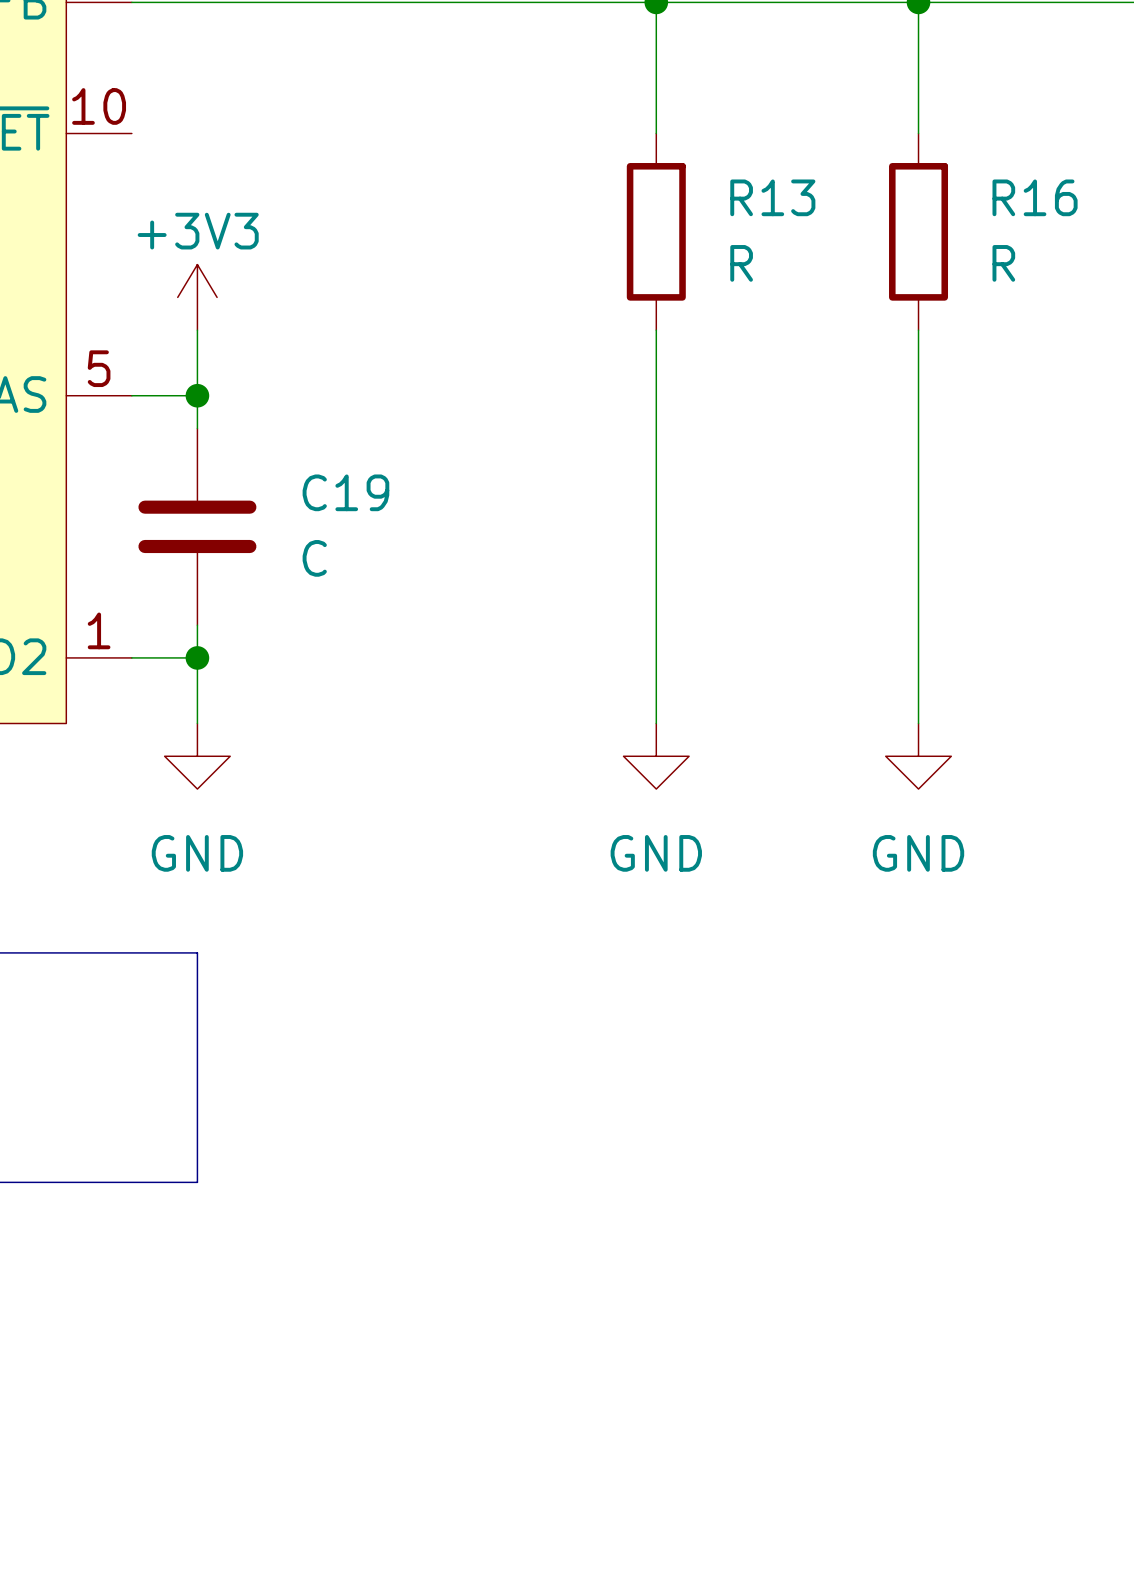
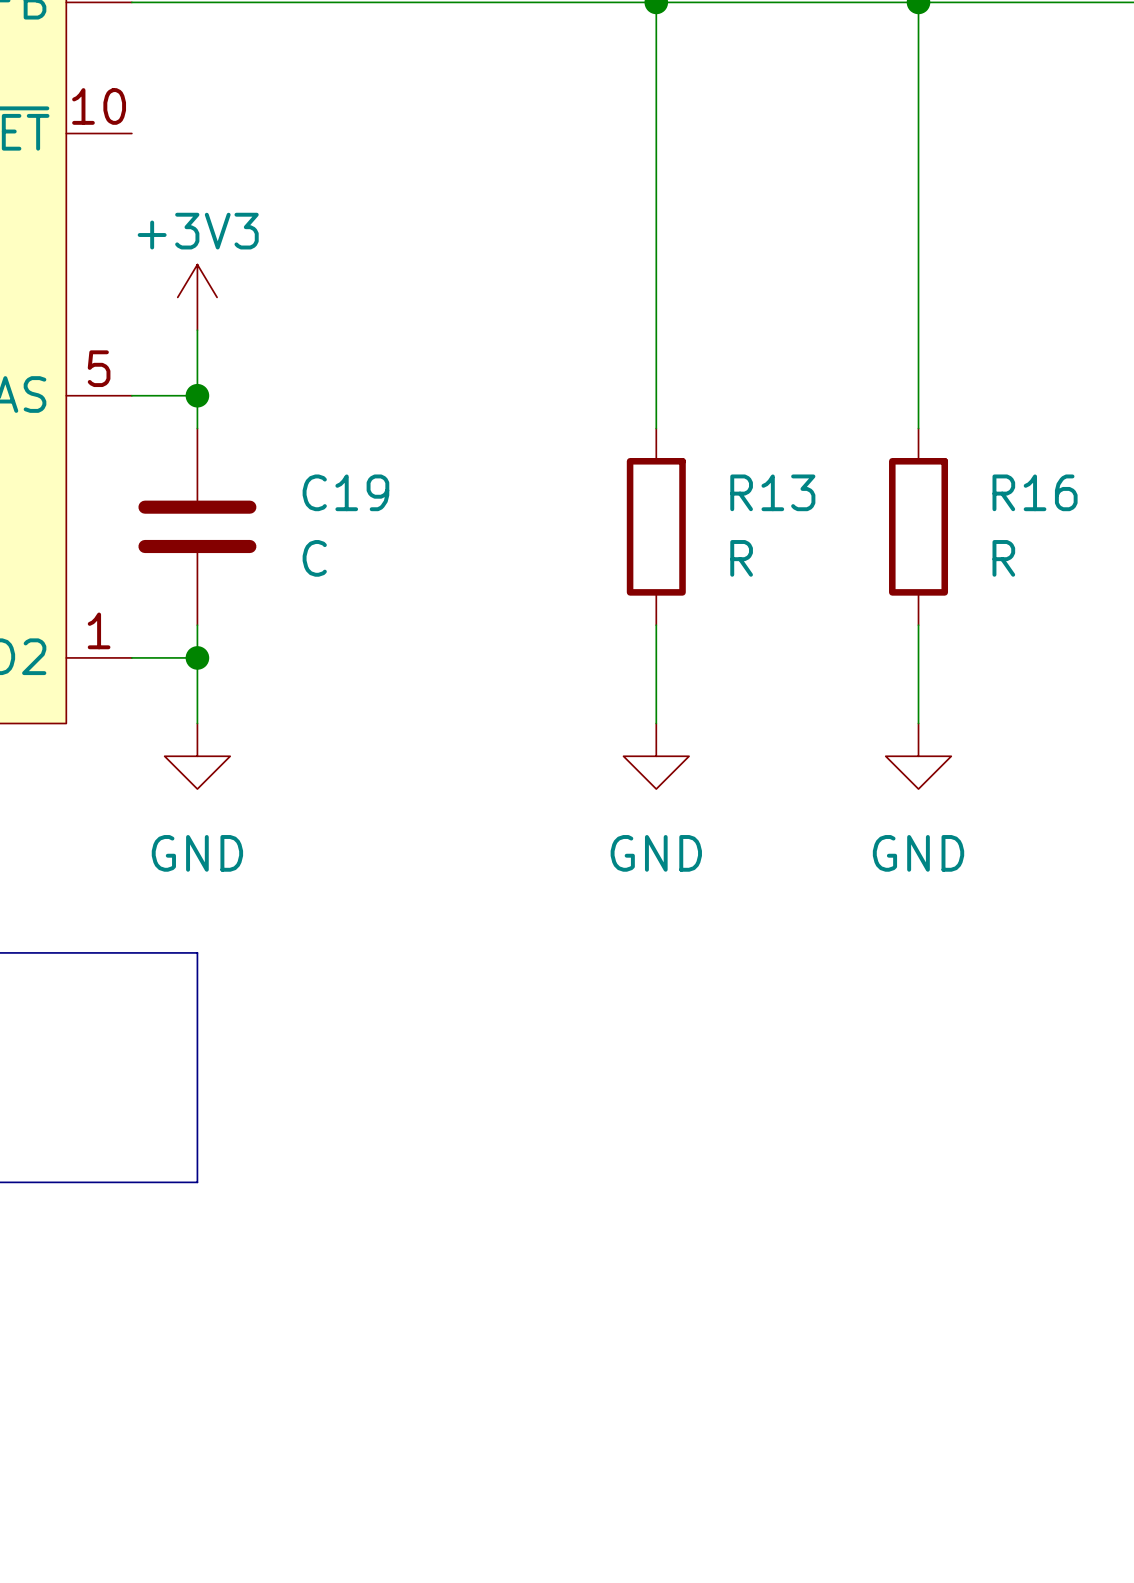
R13 position: (656, 231) -> (656, 526)
R16 position: (918, 231) -> (918, 526)
wire: (656, 428) (656, 625) -> (656, 133) (656, 330)
wire: (918, 428) (918, 625) -> (918, 133) (918, 330)

